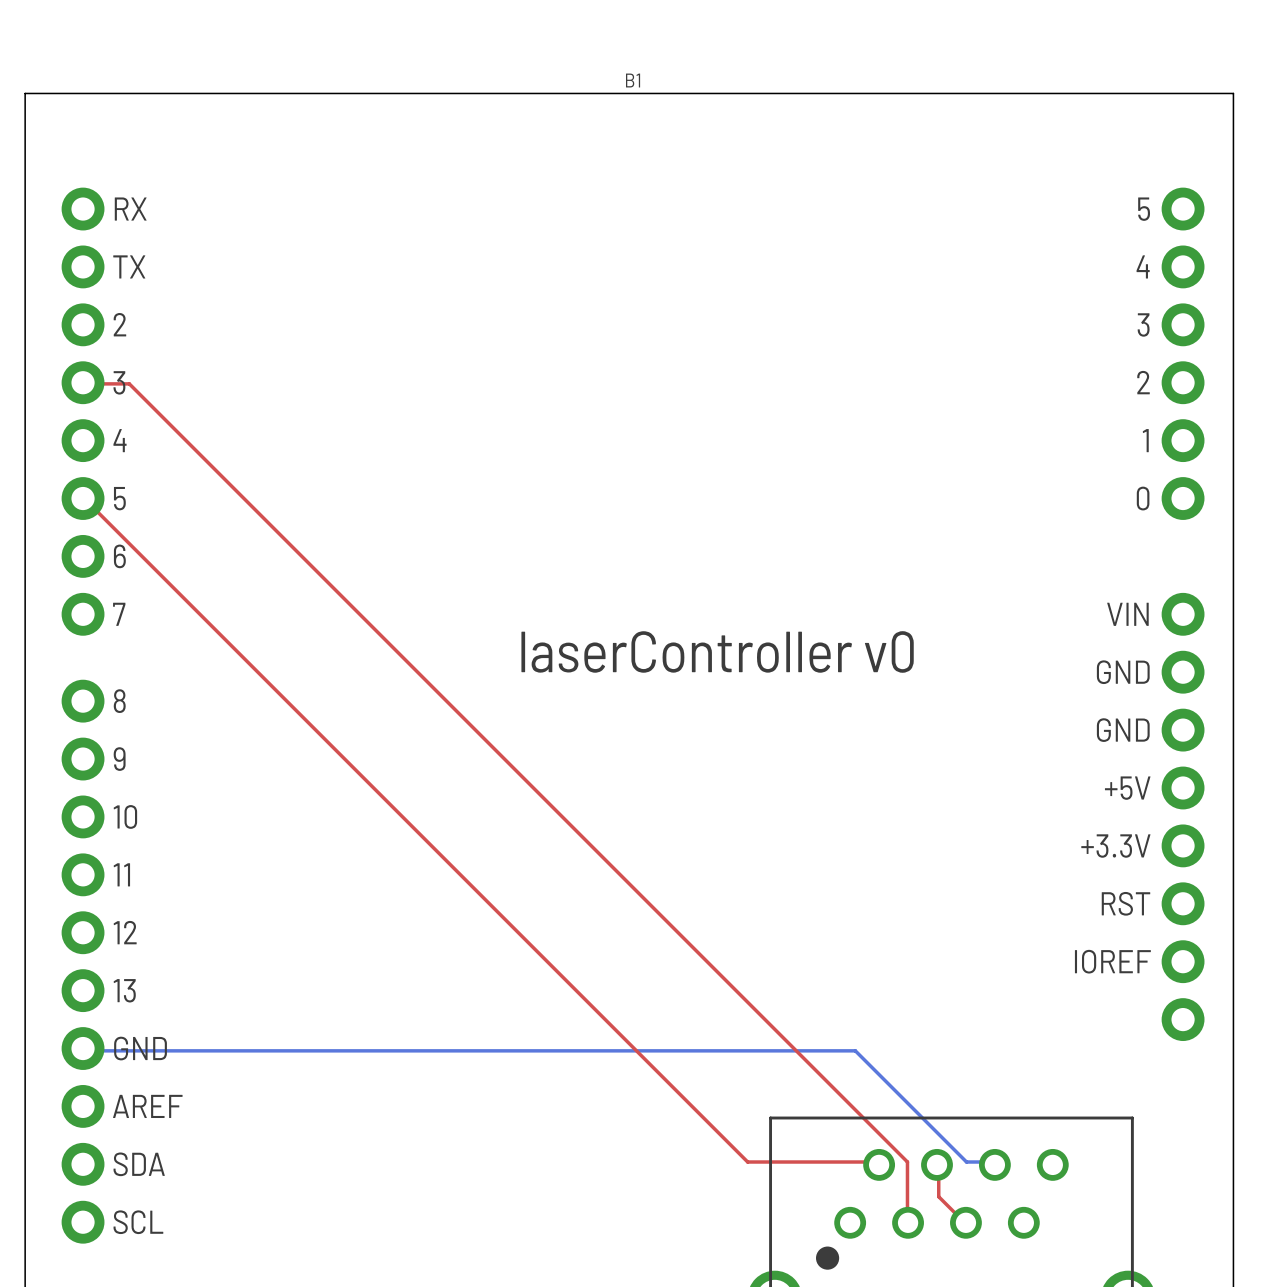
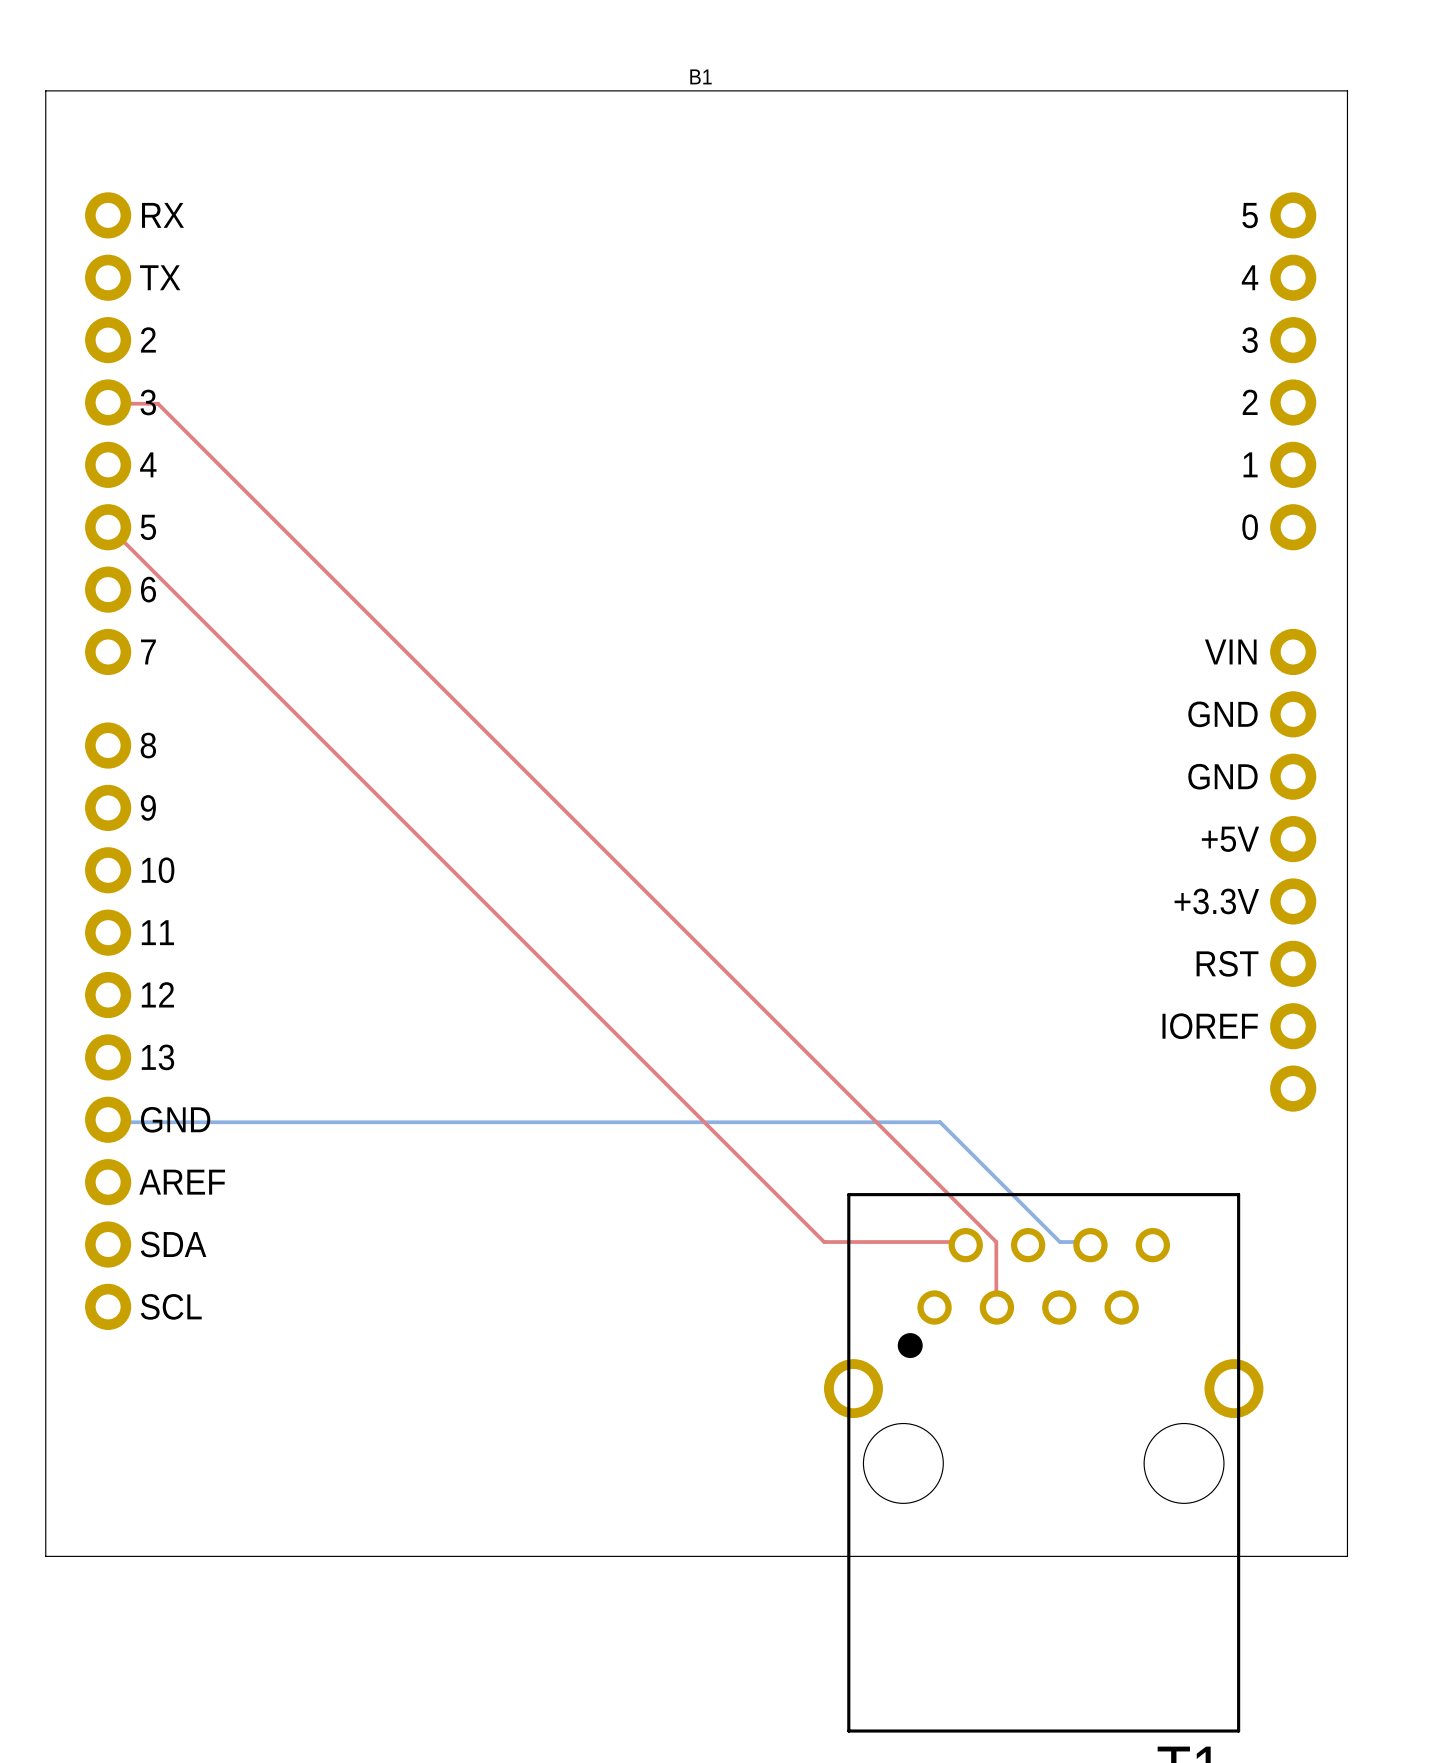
text: laserController v0 (717, 651) -> none
top track: (937, 1164) (938, 1165) (938, 1196) (965, 1222) -> none

